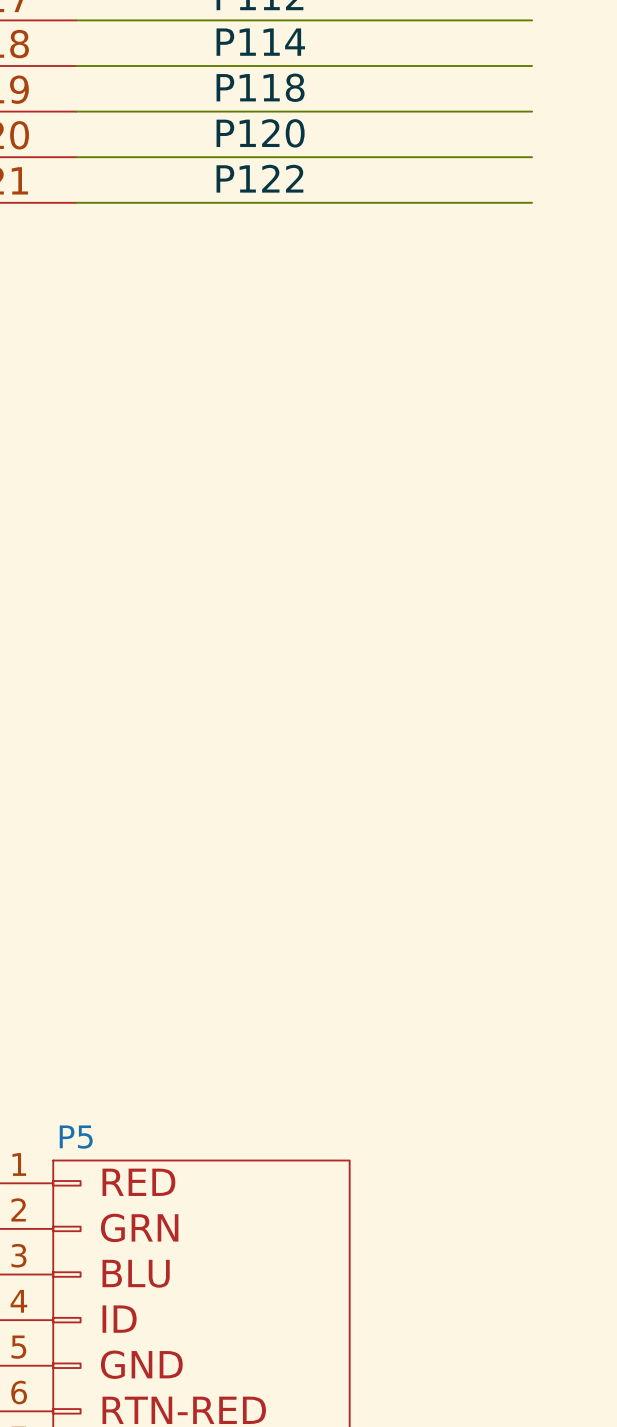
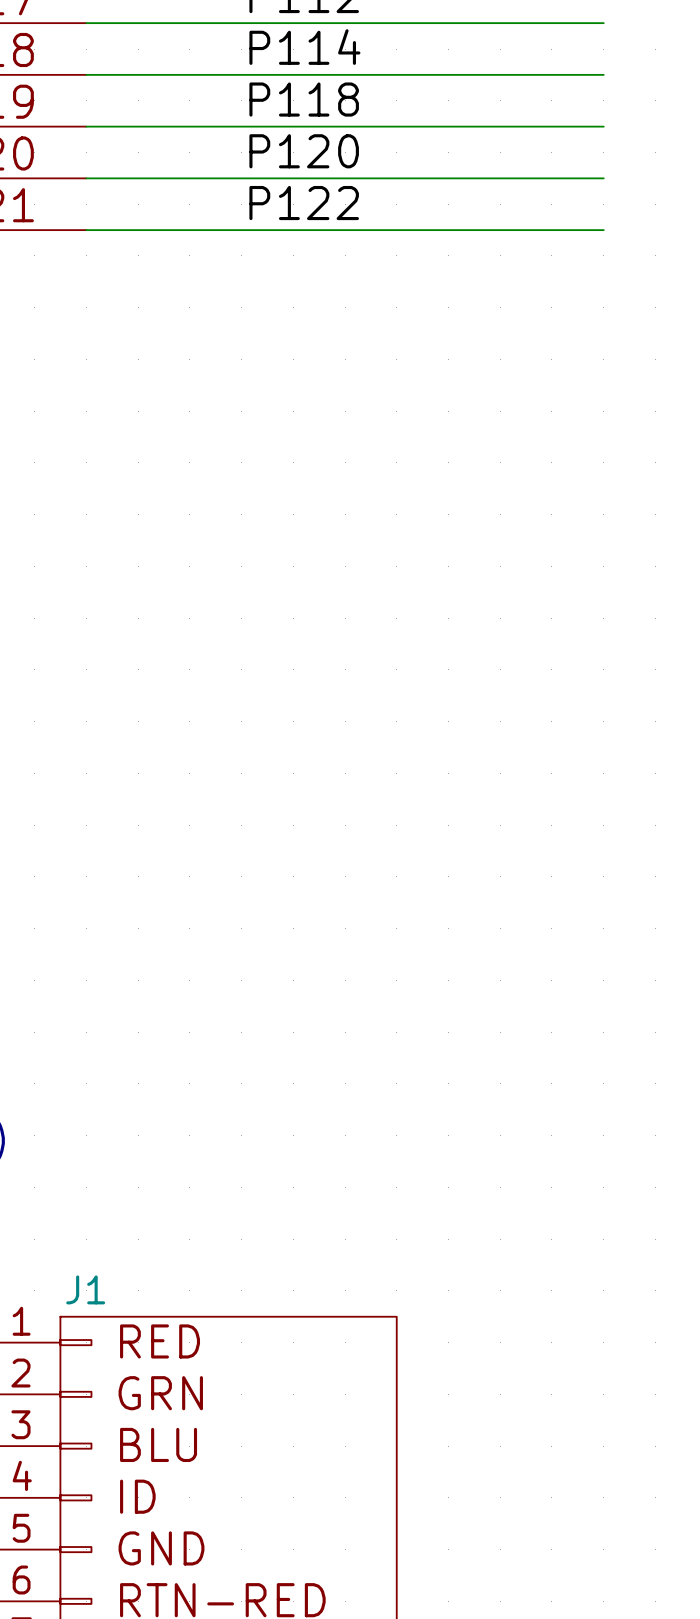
P5 name: P5 (76, 1137) -> J1 (85, 1289)

